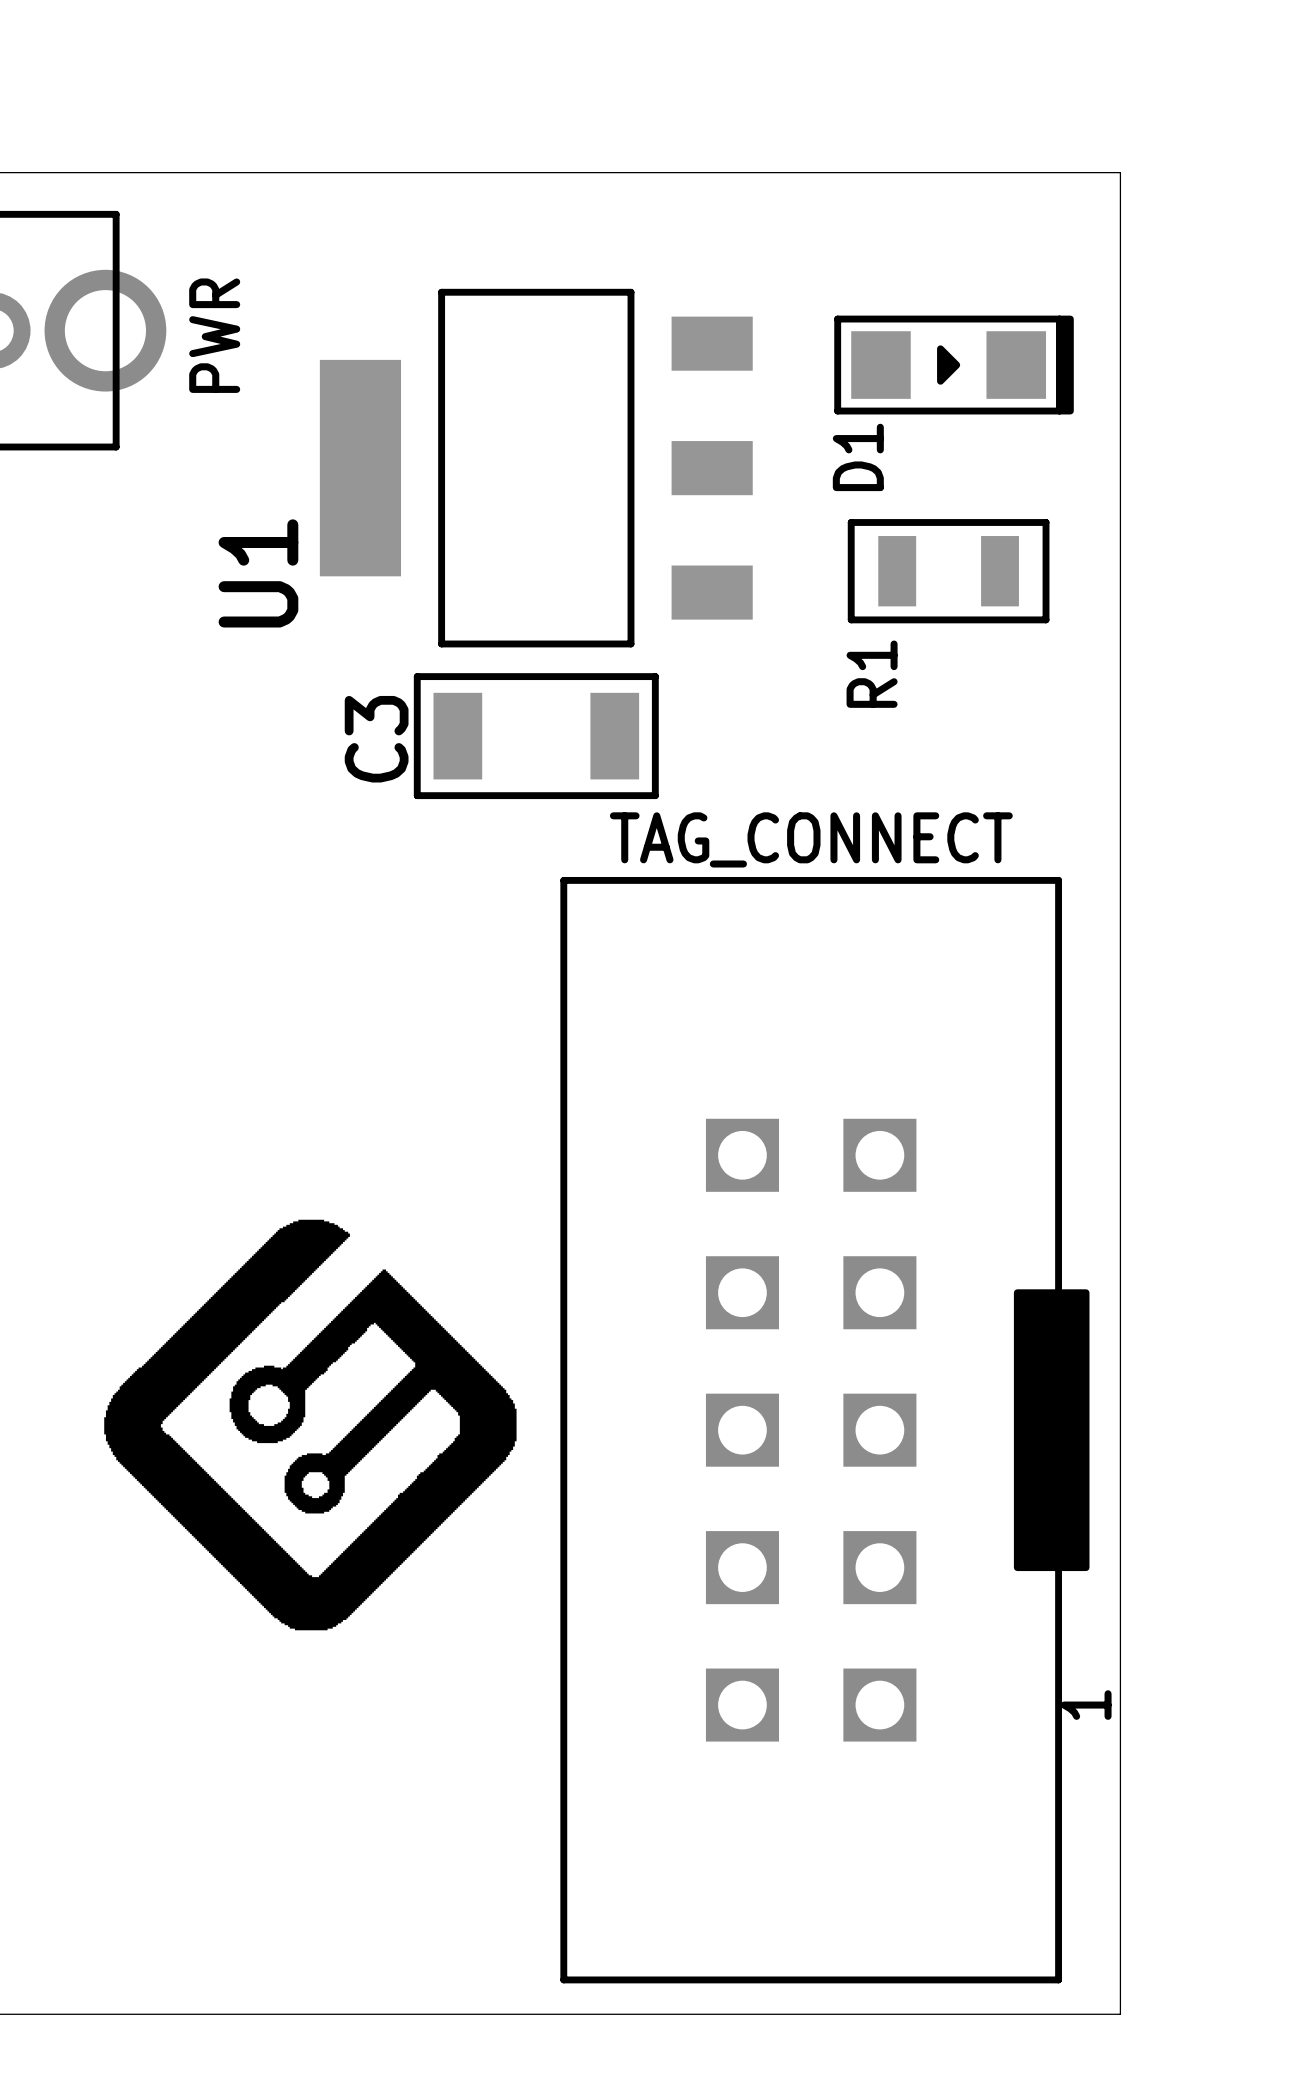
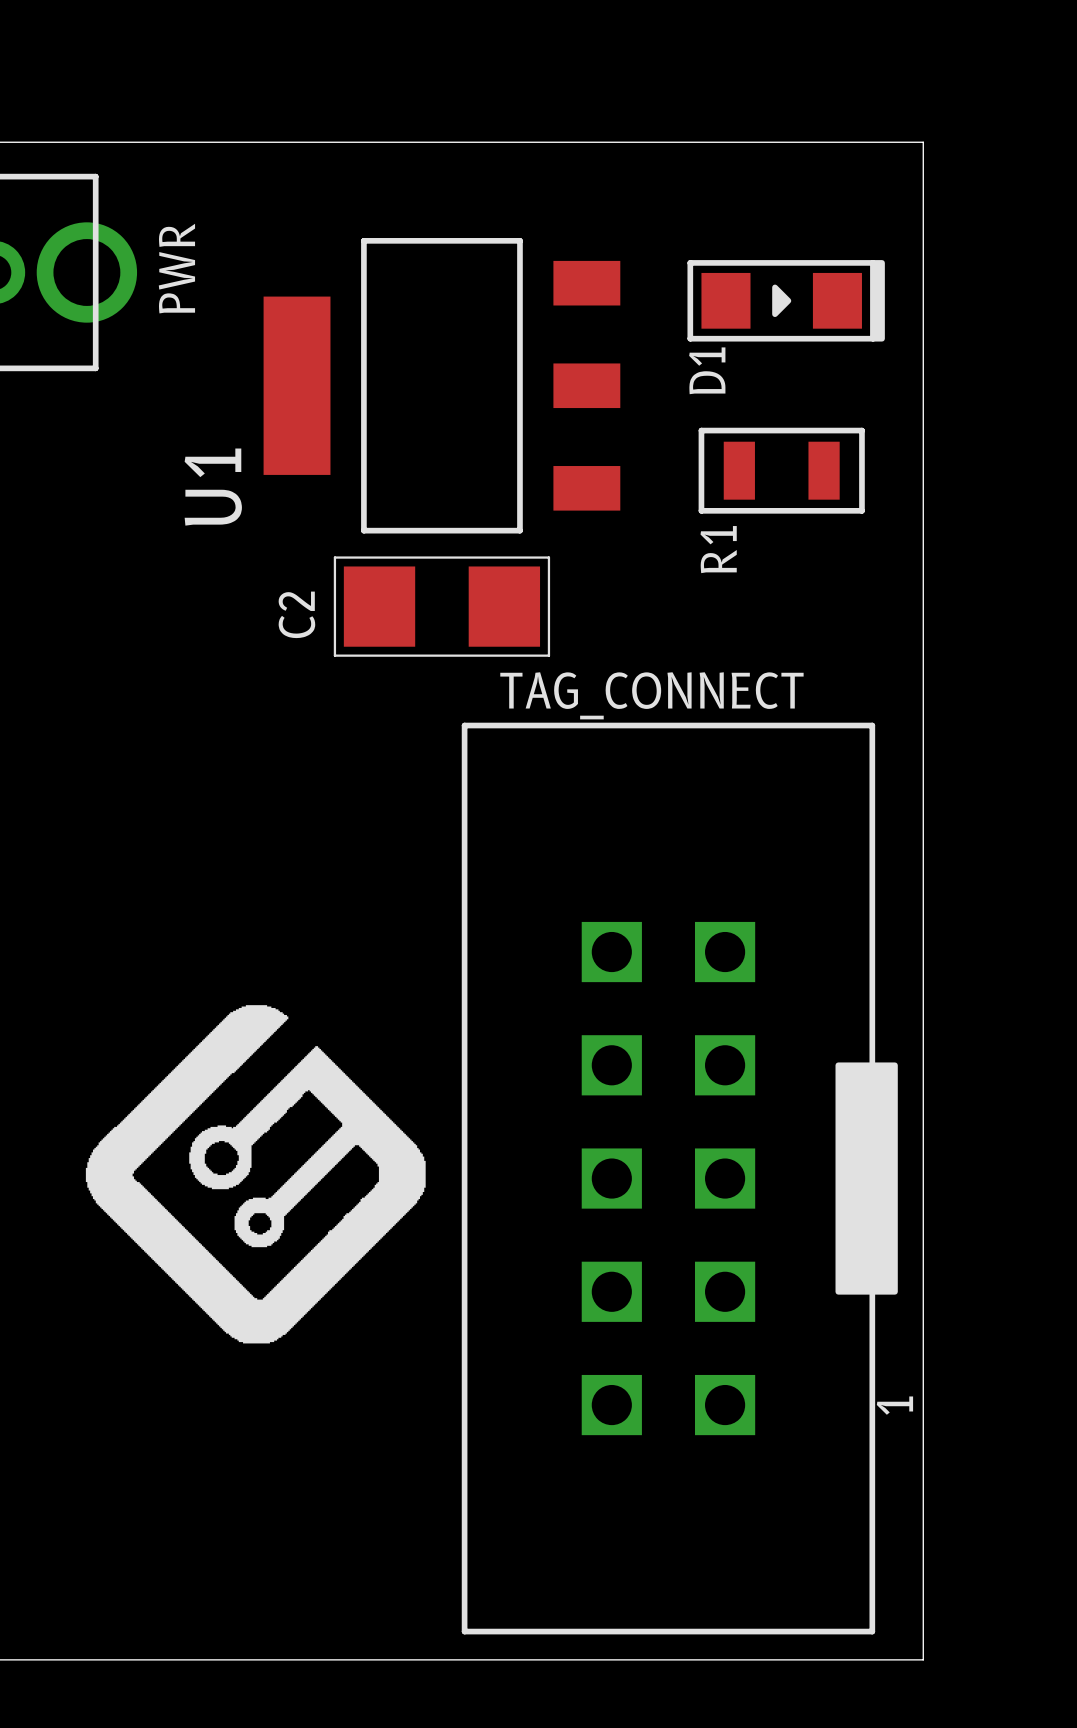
C3: (536, 736) -> none
C2: none -> (441, 606)

